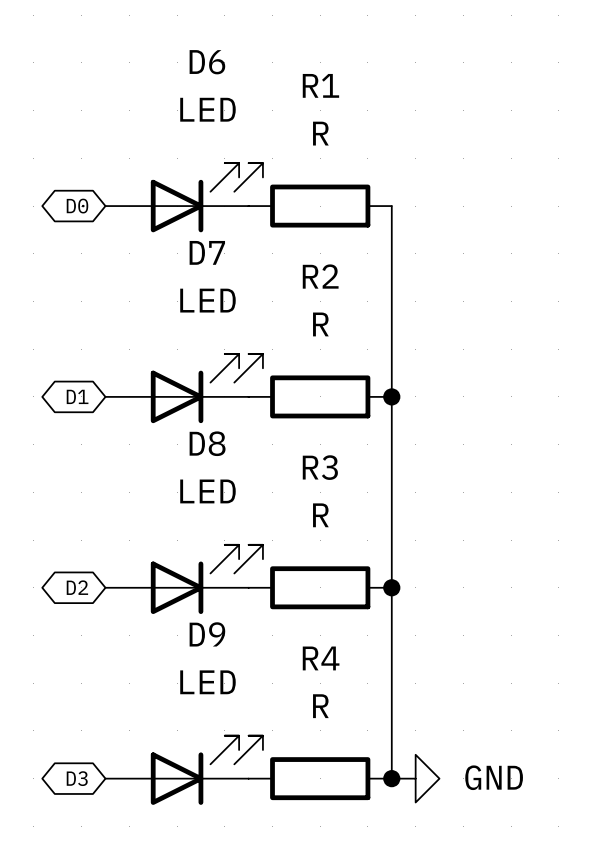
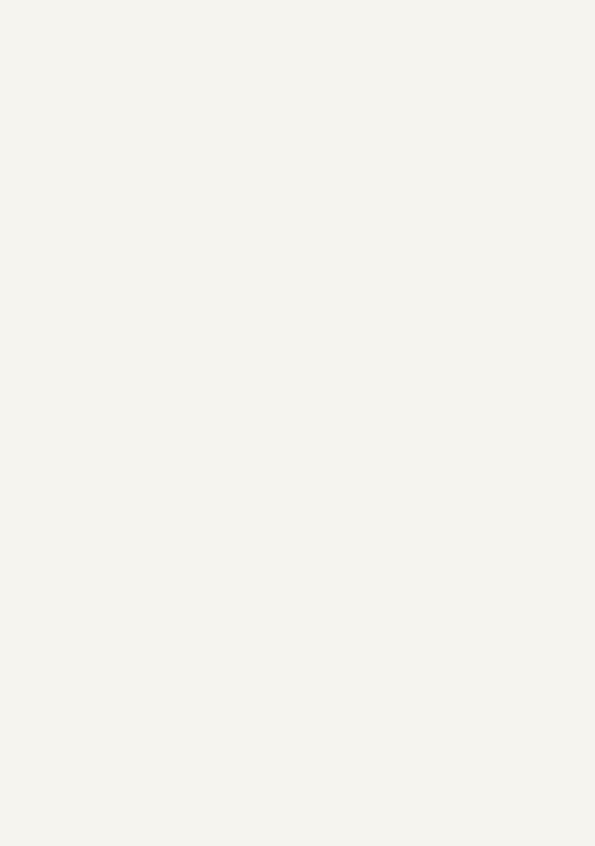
D6: LED (184, 197) -> none
global label: D0 (77, 206) -> none
R1: R (320, 206) -> none
wire: (391, 206) (391, 778) -> none
D7: LED (184, 388) -> none
global label: D1 (77, 396) -> none
R2: R (320, 396) -> none
junction: (391, 396) -> none
D8: LED (184, 579) -> none
global label: D2 (77, 587) -> none
R3: R (320, 587) -> none
junction: (391, 587) -> none
D9: LED (184, 770) -> none
global label: D3 (77, 778) -> none
R4: R (320, 778) -> none
junction: (391, 778) -> none
power symbol: GND (415, 778) -> none

